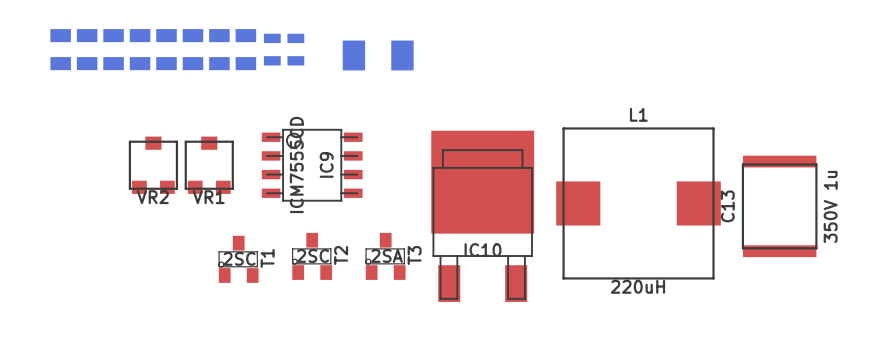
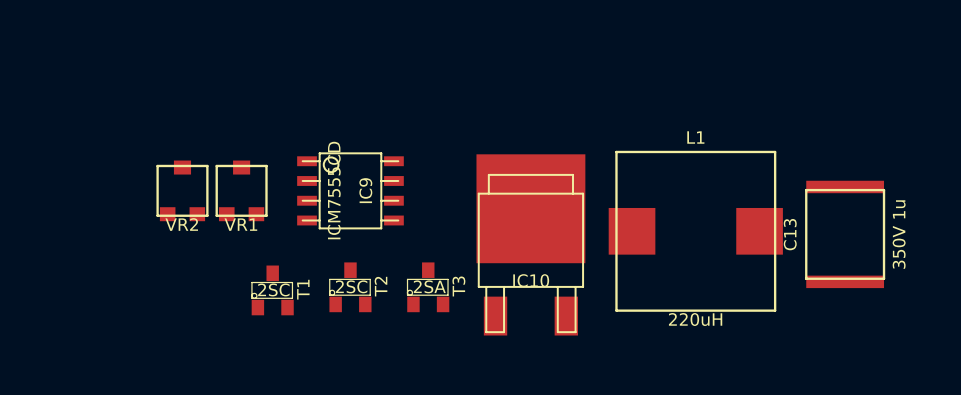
part: (60, 49) -> none
part: (87, 49) -> none
part: (113, 49) -> none
part: (140, 49) -> none
part: (166, 49) -> none
part: (192, 49) -> none
part: (219, 49) -> none
part: (245, 49) -> none
part: (272, 49) -> none
part: (295, 49) -> none
part: (378, 55) -> none

